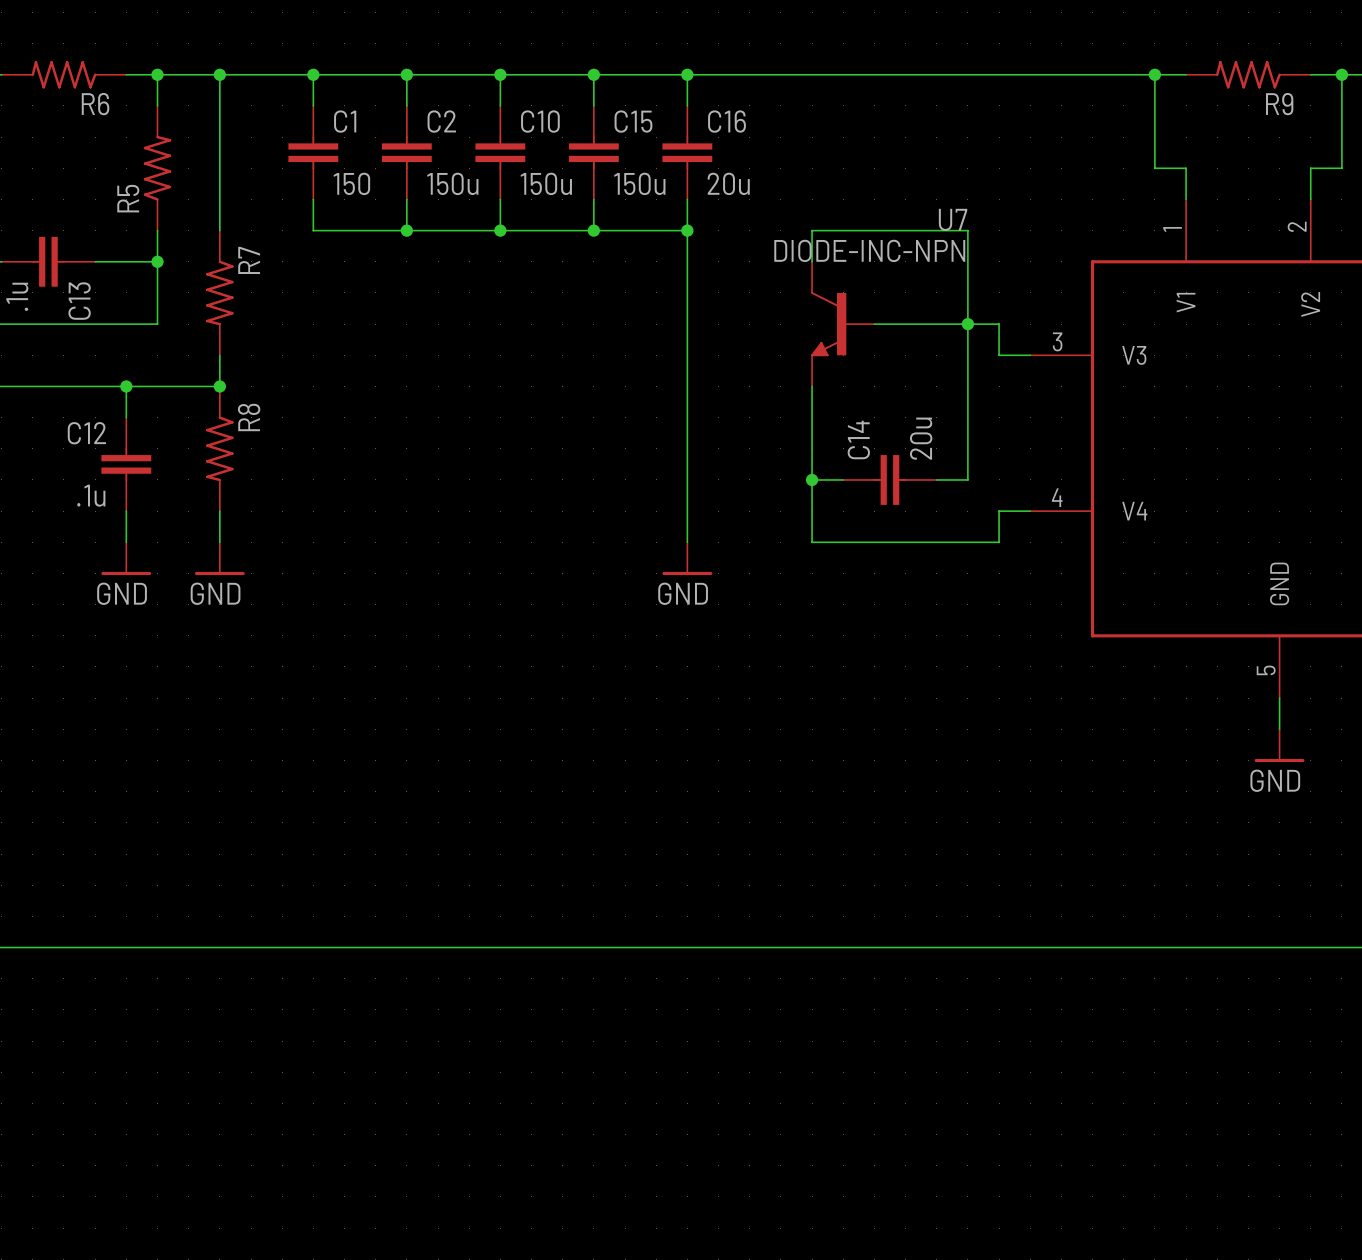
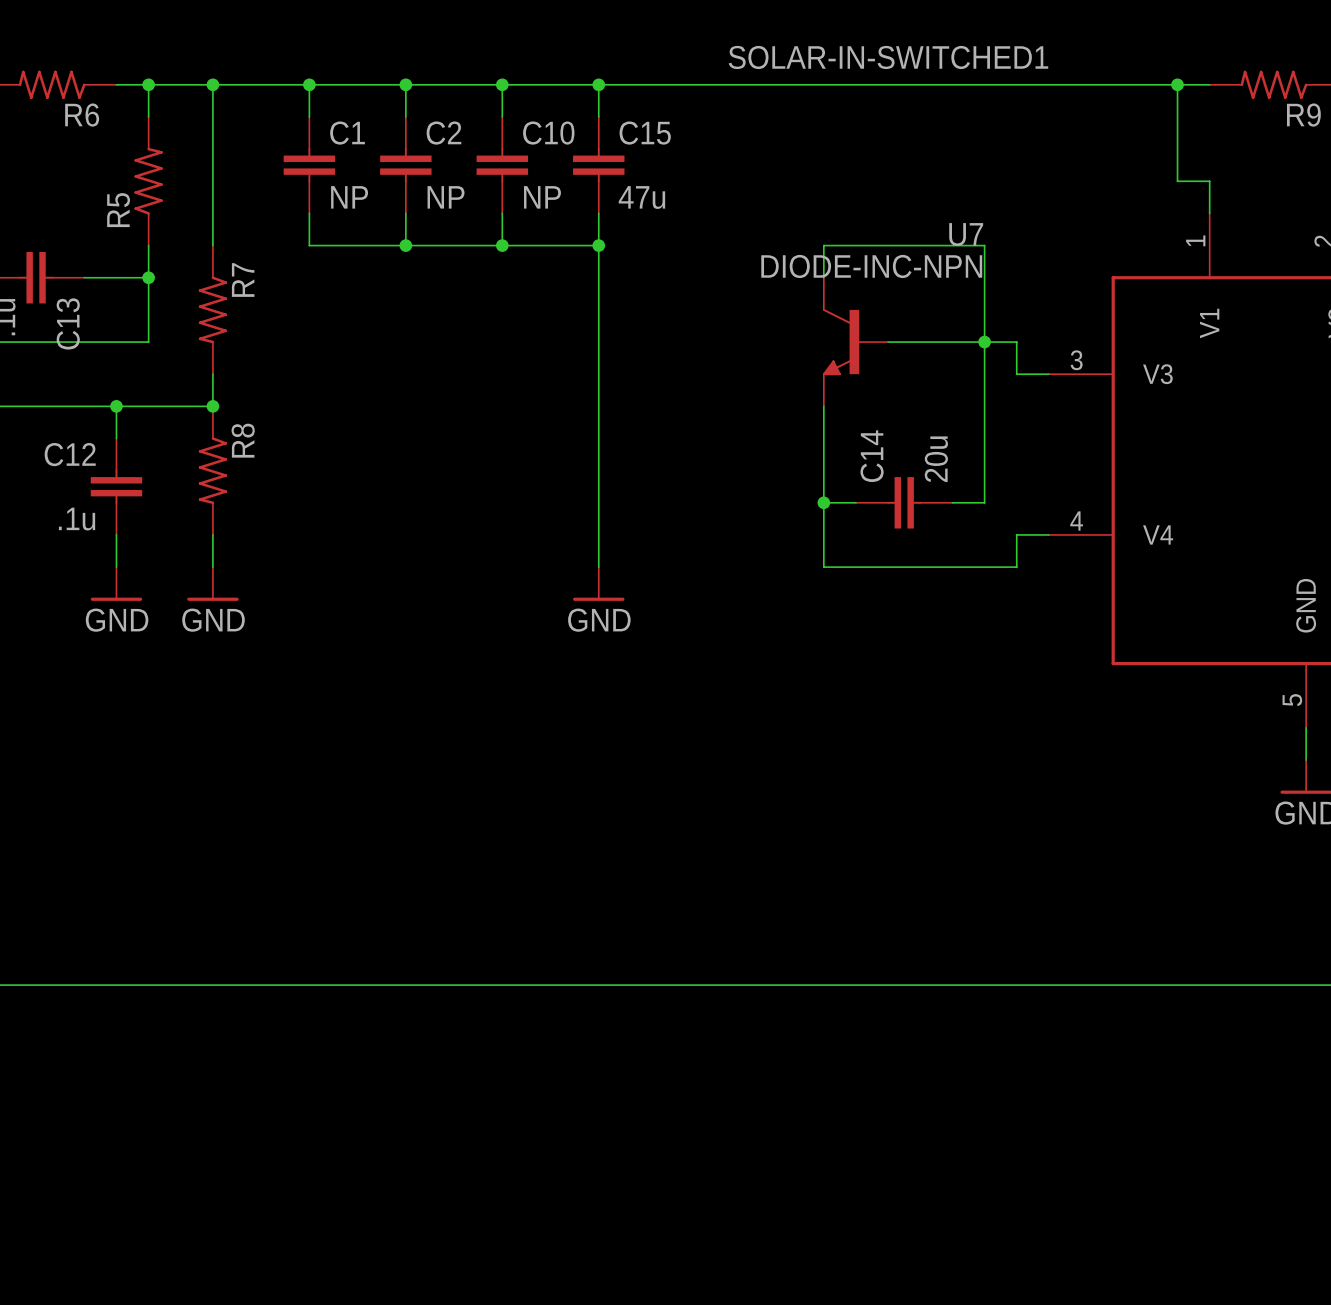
label: none -> SOLAR-IN-SWITCHED1 (888, 57)
wire: (687, 74) (687, 105) -> none
junction: (687, 74) -> none
C16: 20u (687, 152) -> none
C1 value: 150 (351, 183) -> NP (349, 197)
C2 value: 150u (452, 183) -> NP (446, 197)
C10 value: 150u (546, 183) -> NP (542, 197)
C15 value: 150u (639, 183) -> 47u (641, 197)
wire: (687, 199) (687, 542) -> none
wire: (593, 230) (687, 230) -> (598, 245) (598, 567)
junction: (687, 230) -> none
power symbol position: GND (687, 558) -> GND (598, 583)

